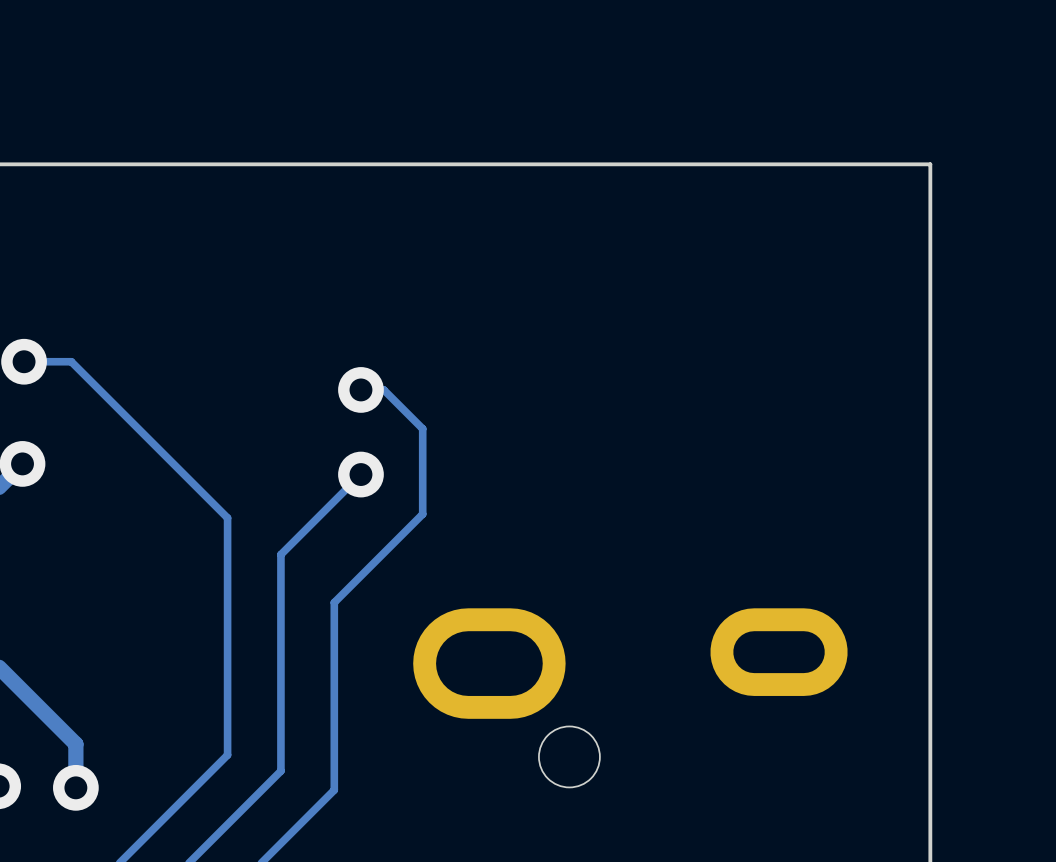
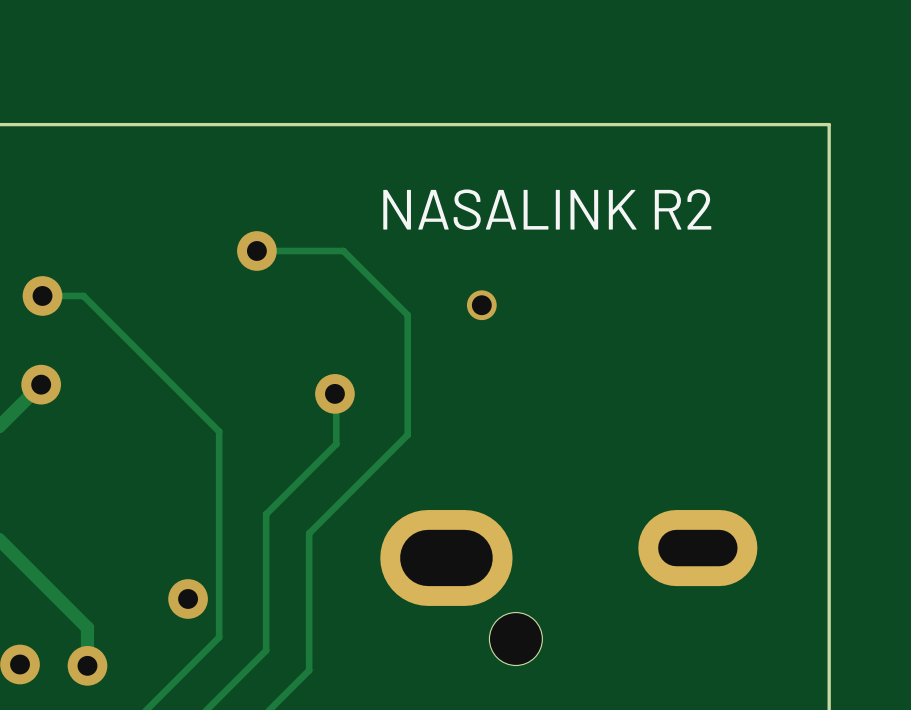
text: none -> NASALINK R2 (547, 209)
via: none -> (481, 305)
track: (360, 389) (383, 389) (422, 428) (422, 514) (334, 602) (334, 790) (331, 793) -> (256, 250) (343, 250) (407, 315) (407, 434) (309, 533) (309, 670)
via position: (360, 389) -> (256, 250)
track: (360, 474) (280, 554) (280, 771) -> (336, 395) (336, 444) (266, 514) (266, 650)
via: none -> (188, 598)

